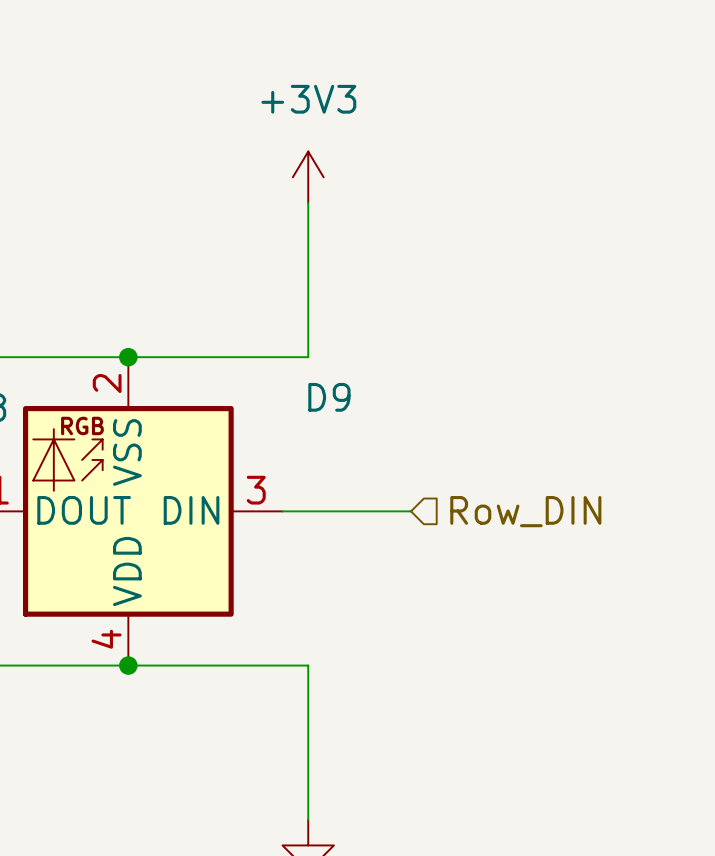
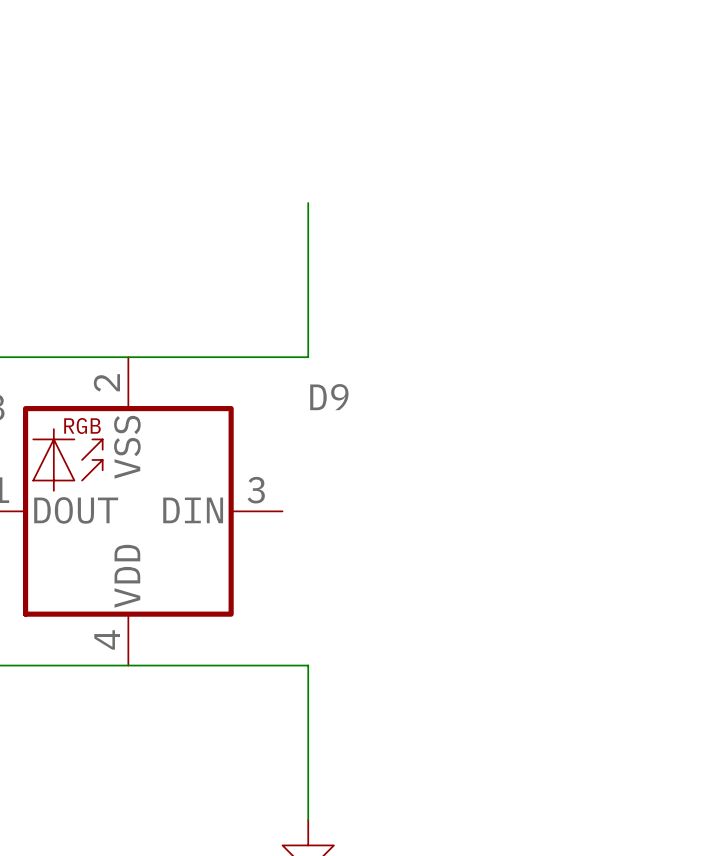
power symbol: +3V3 (308, 177) -> none
junction: (128, 357) -> none
wire: (282, 511) (411, 511) -> none
hierarchical label: Row_DIN (525, 511) -> none
junction: (128, 665) -> none

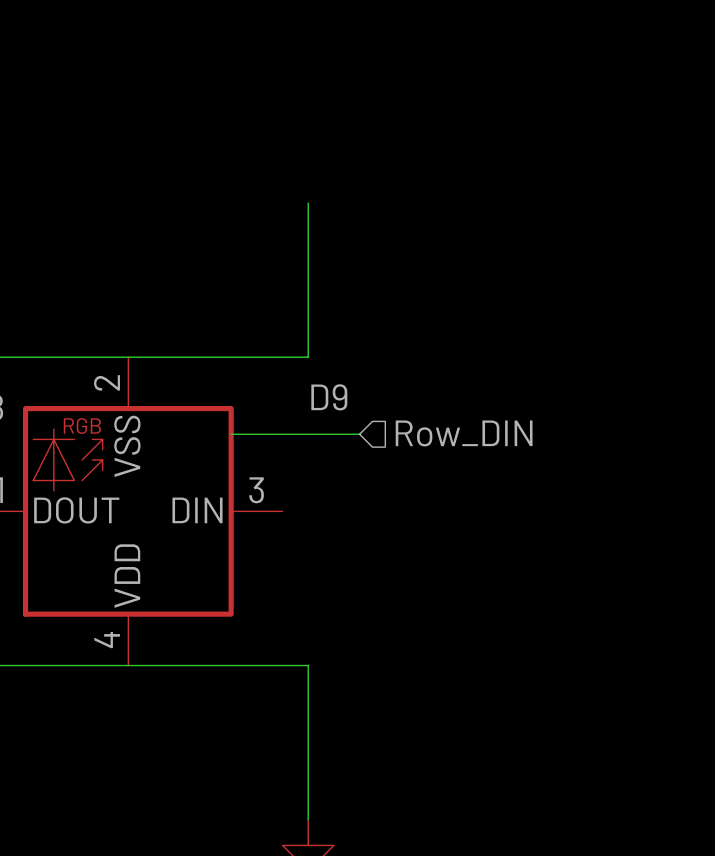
wire: none -> (231, 434) (359, 434)
hierarchical label: none -> Row_DIN (464, 433)

